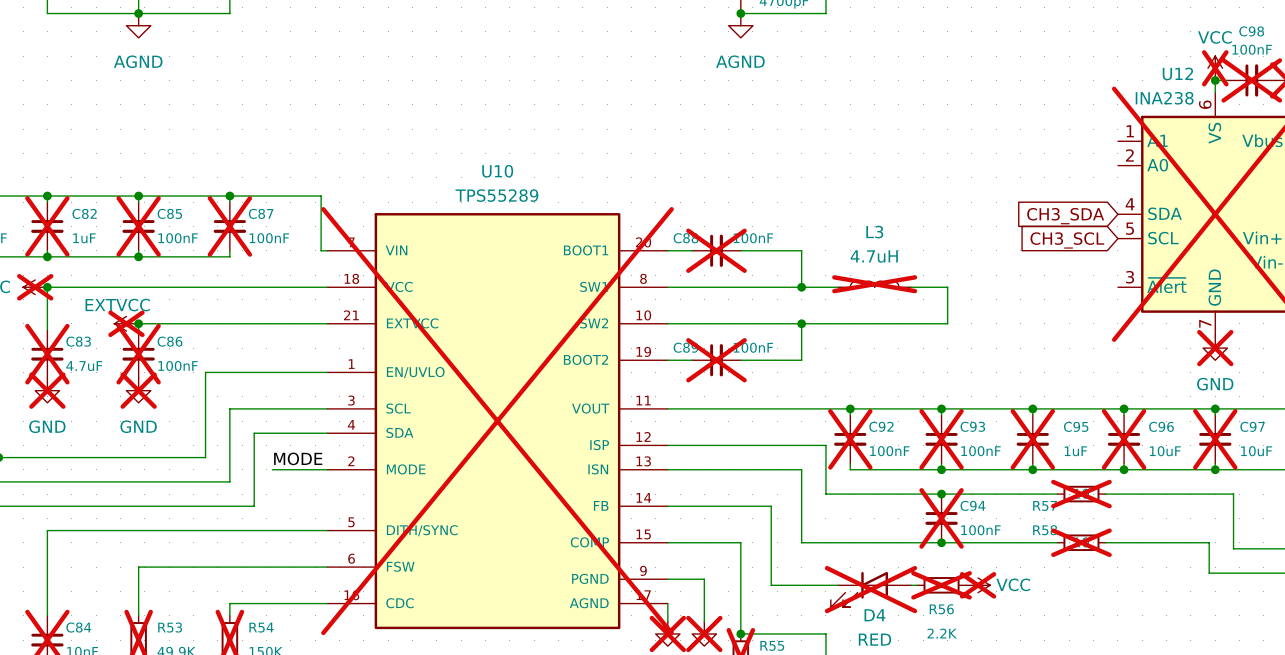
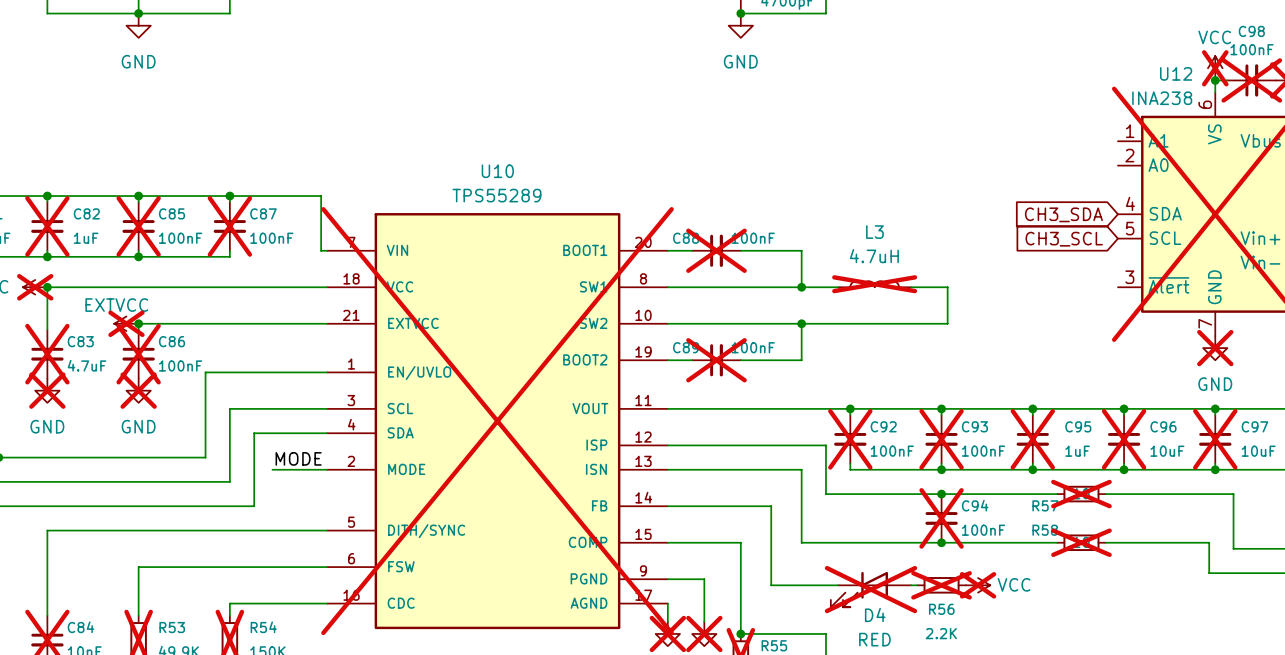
power symbol: AGND (138, 25) -> GND (138, 25)
power symbol: AGND (740, 25) -> GND (740, 25)

